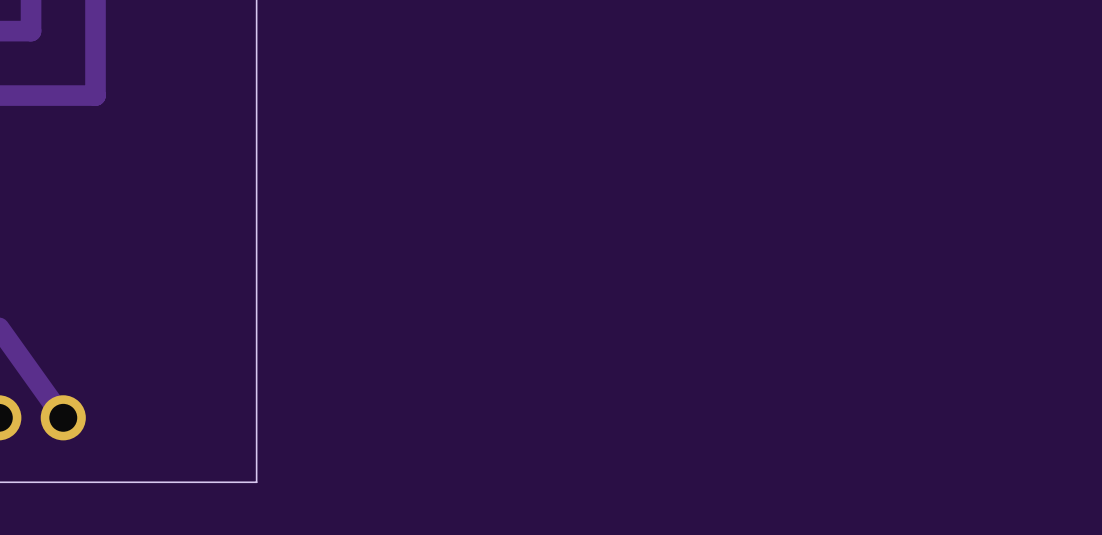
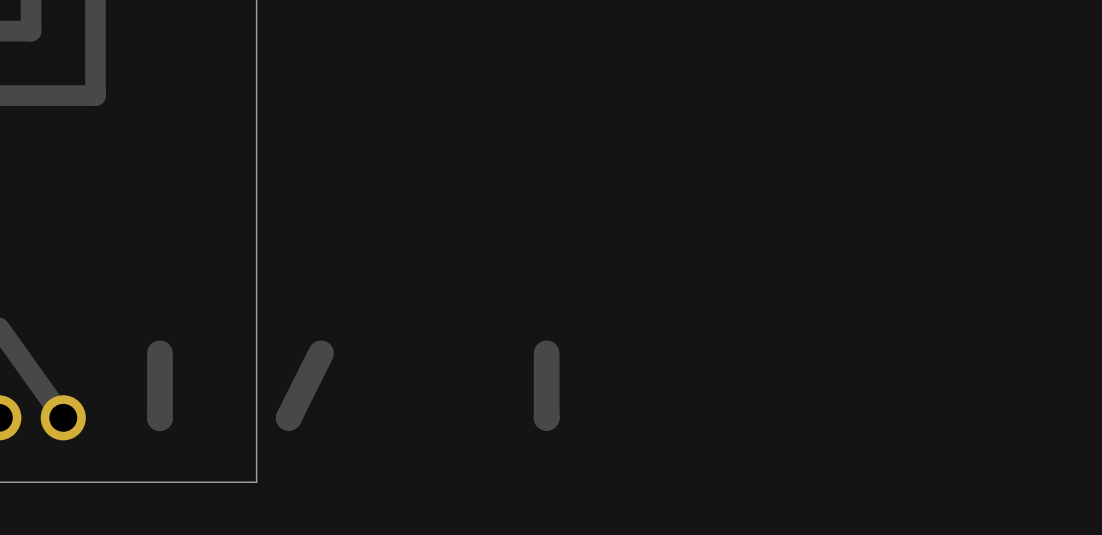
track: none -> (159, 353) (159, 417)
track: none -> (321, 353) (288, 417)
track: none -> (546, 353) (546, 417)

